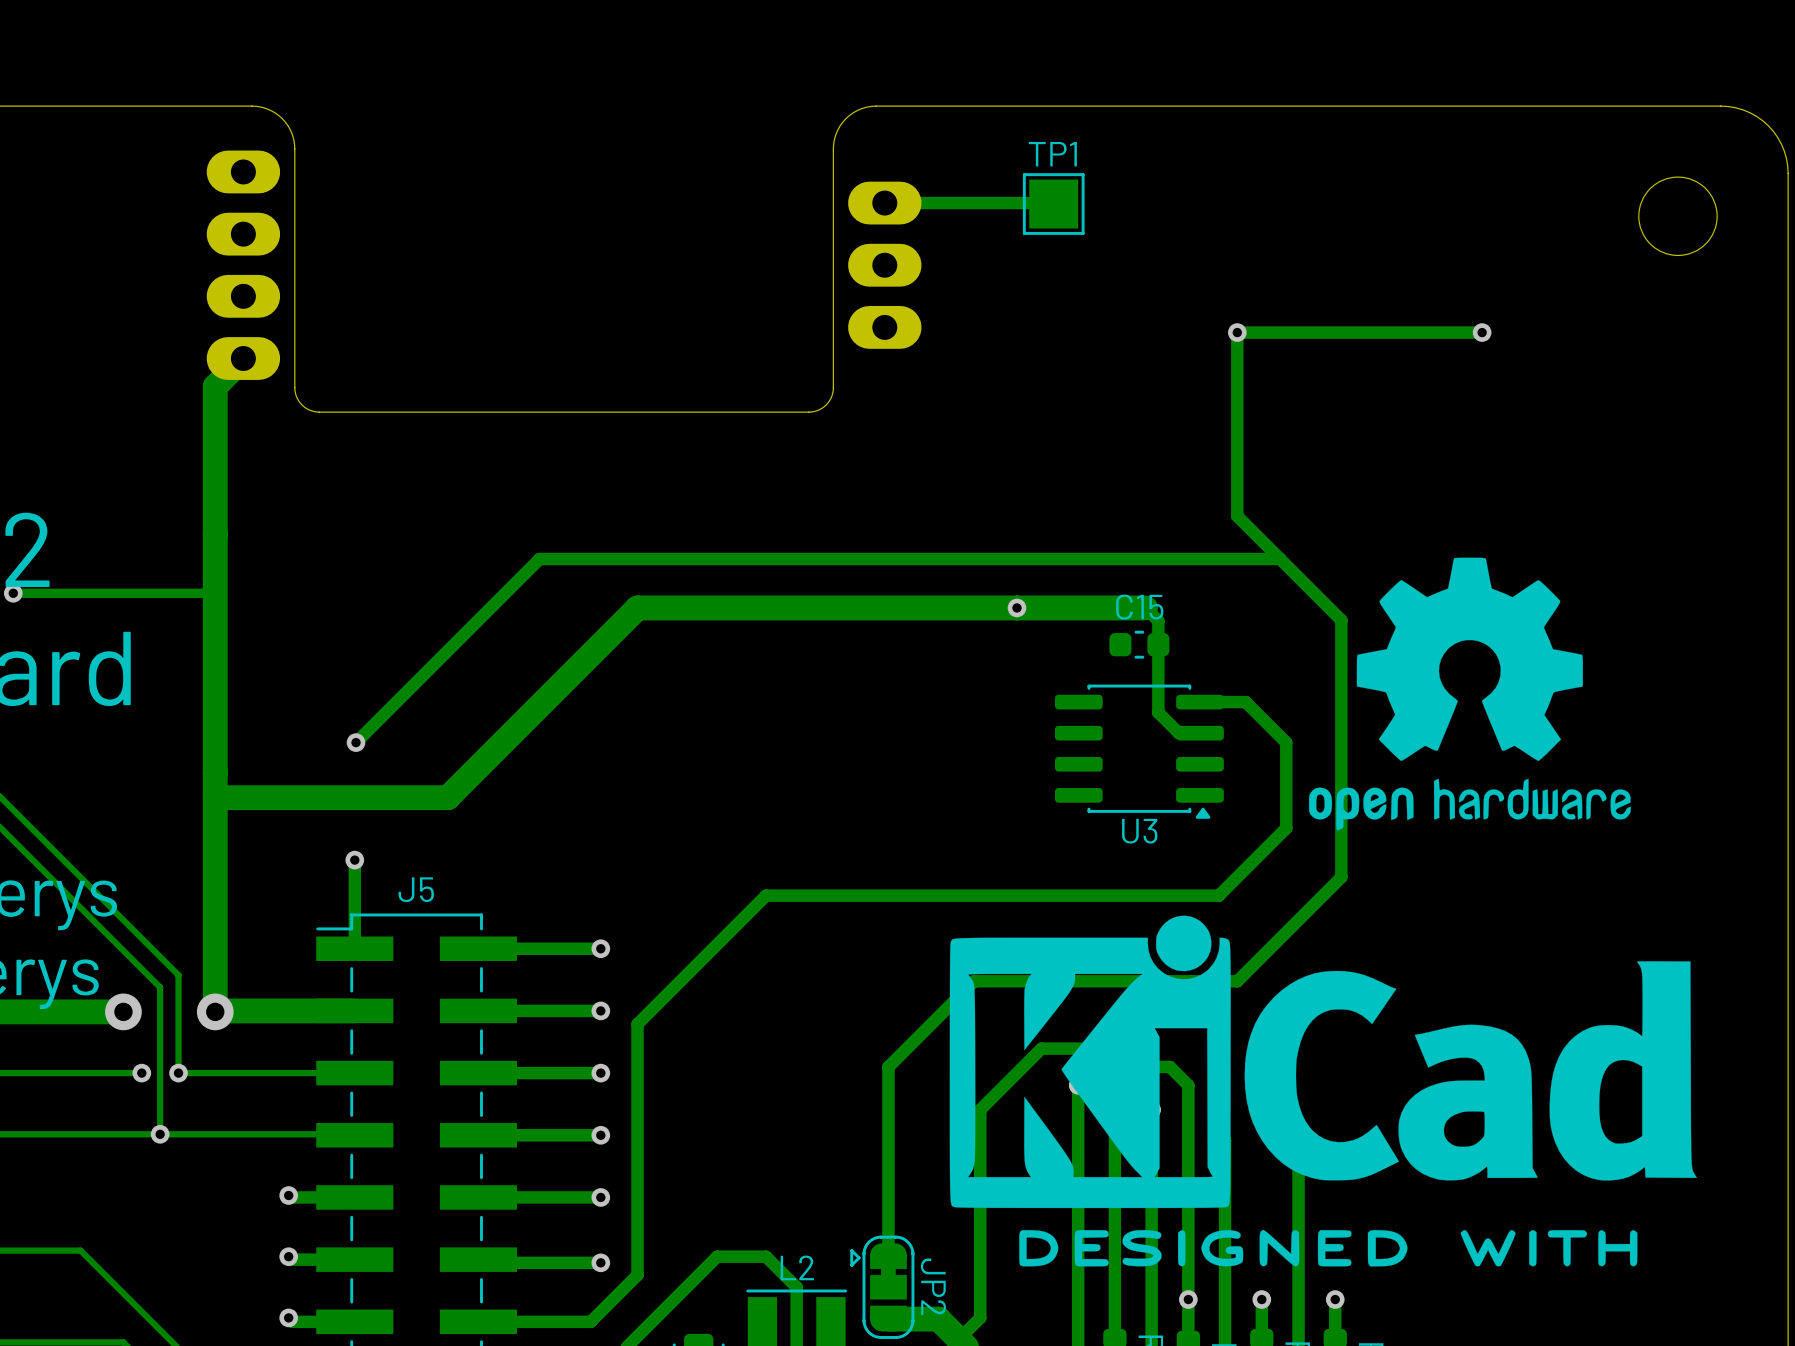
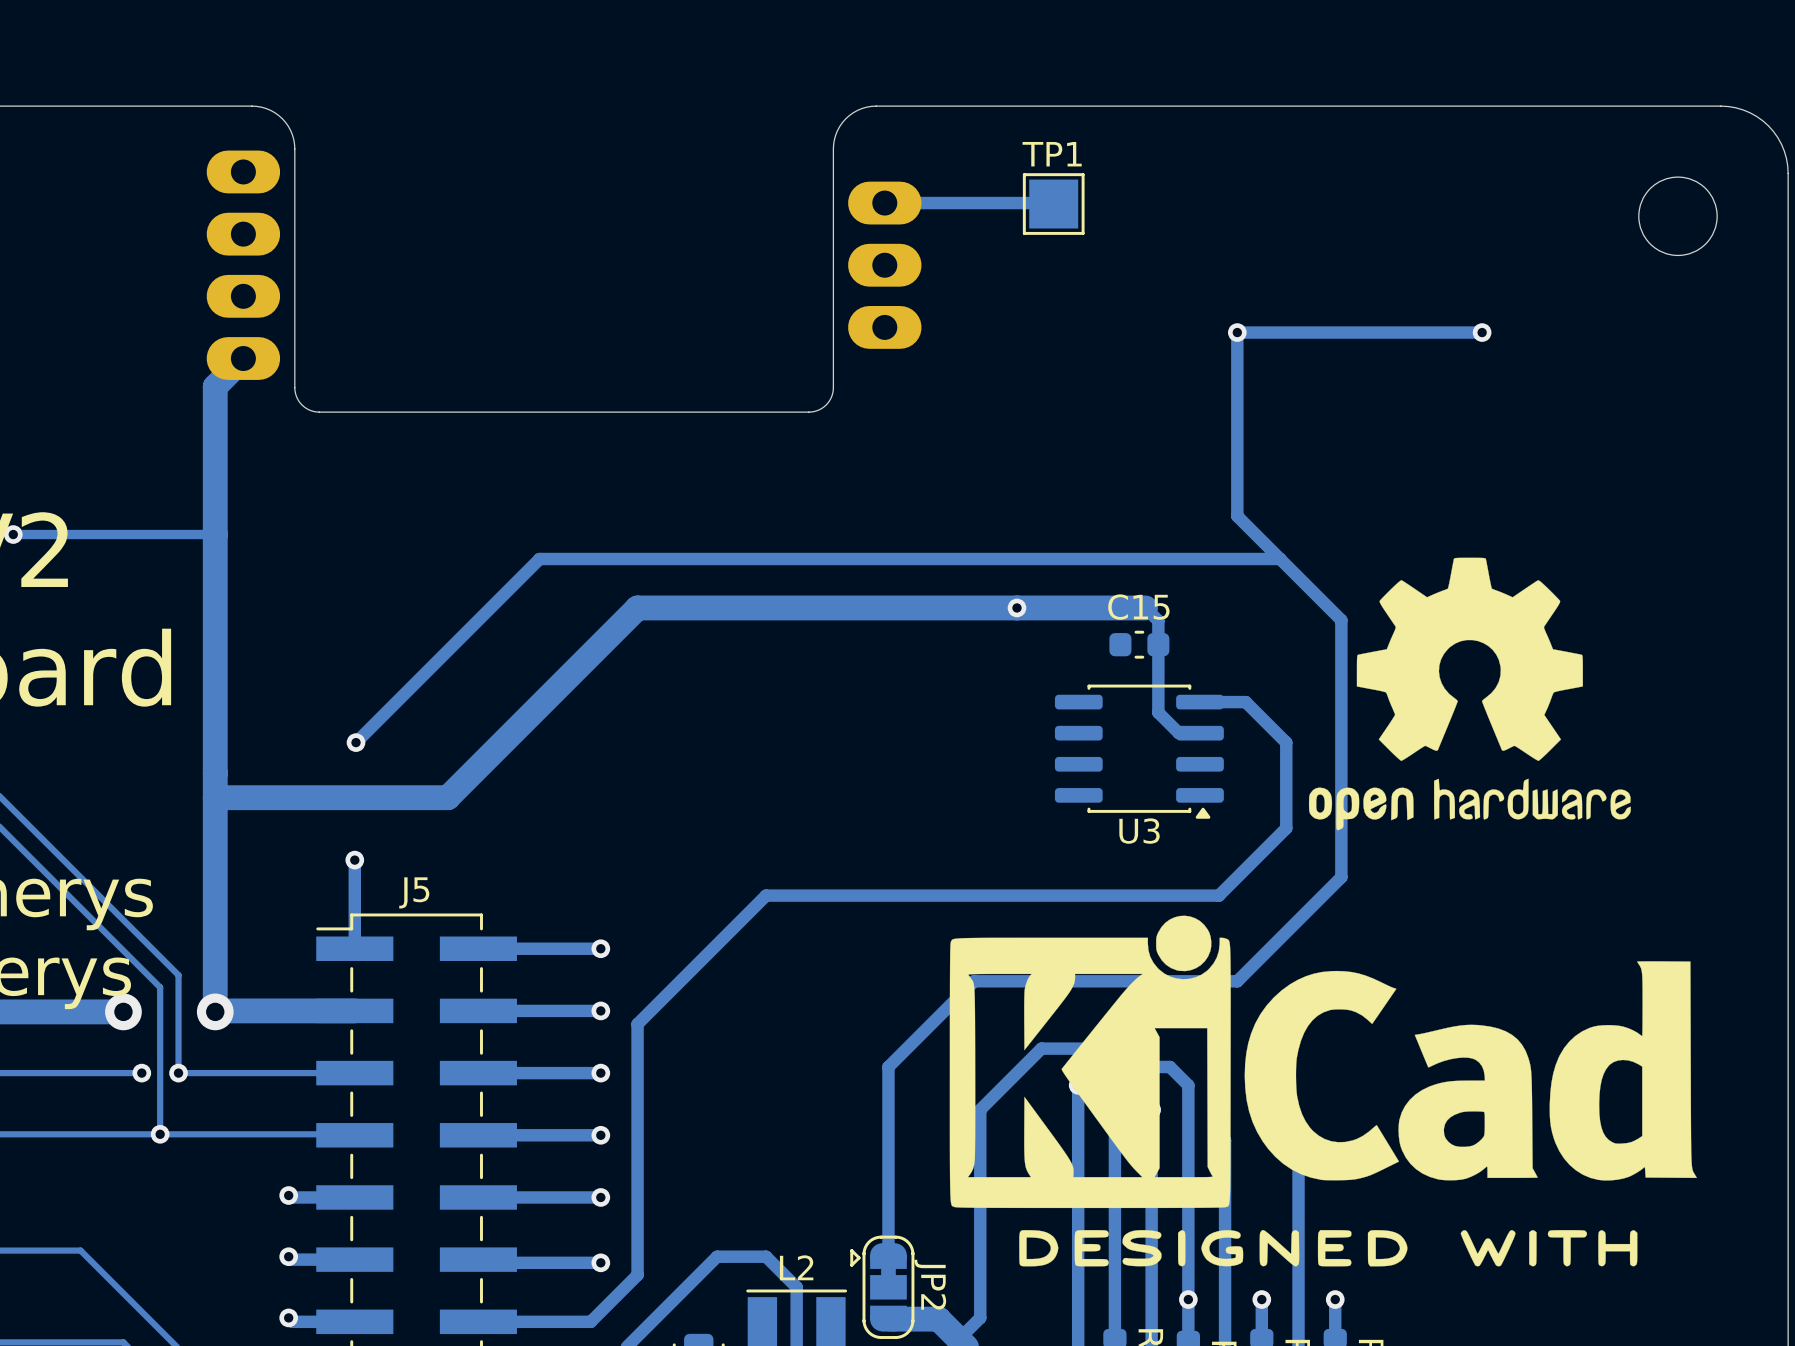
track: (215, 534) (215, 593) (13, 593) -> (215, 534) (13, 534)
via position: (13, 593) -> (13, 534)

